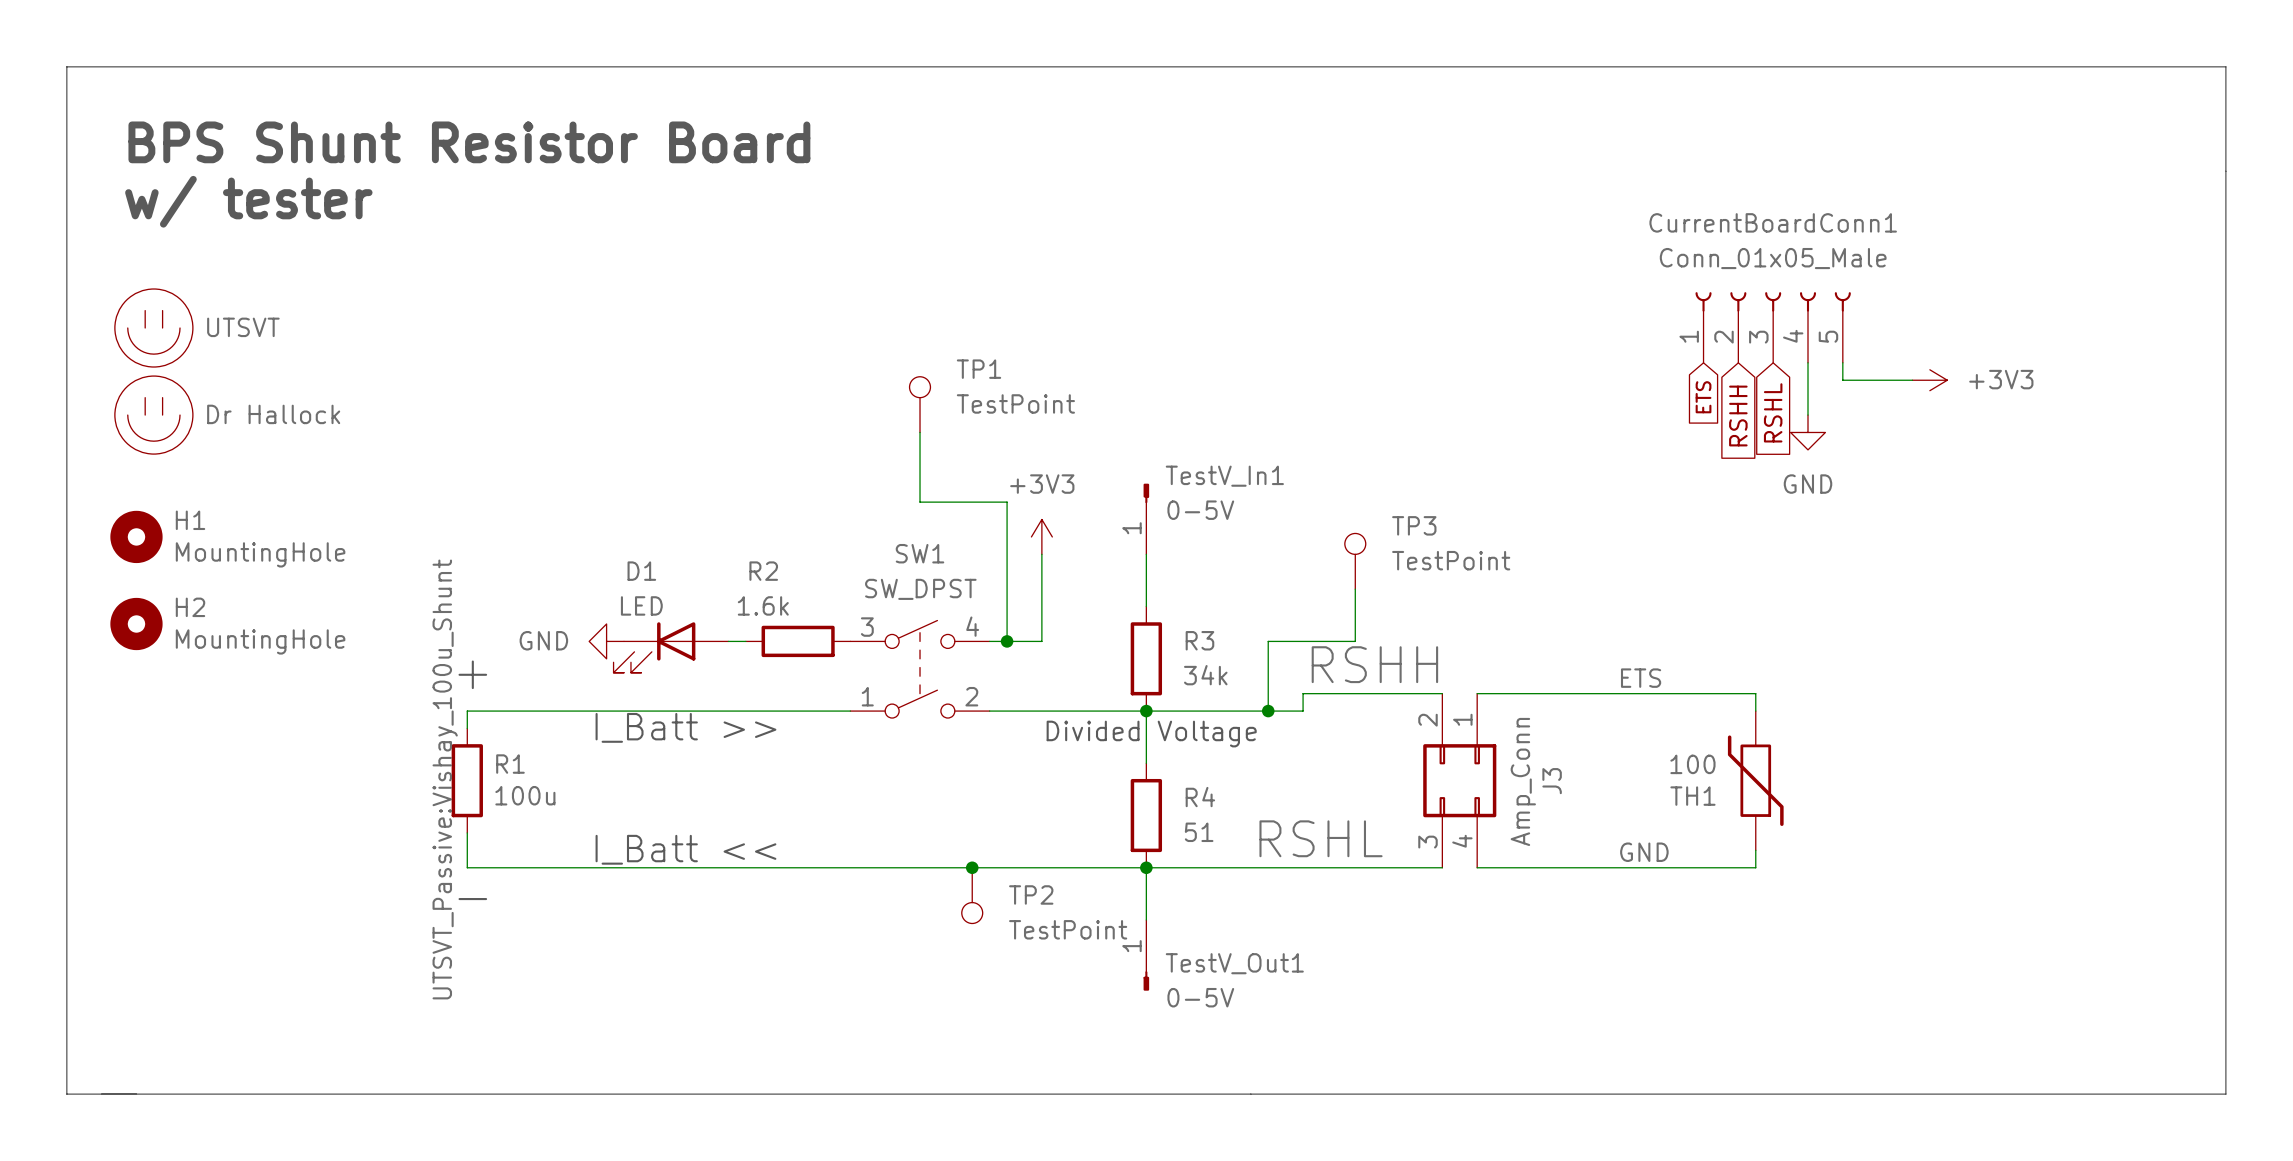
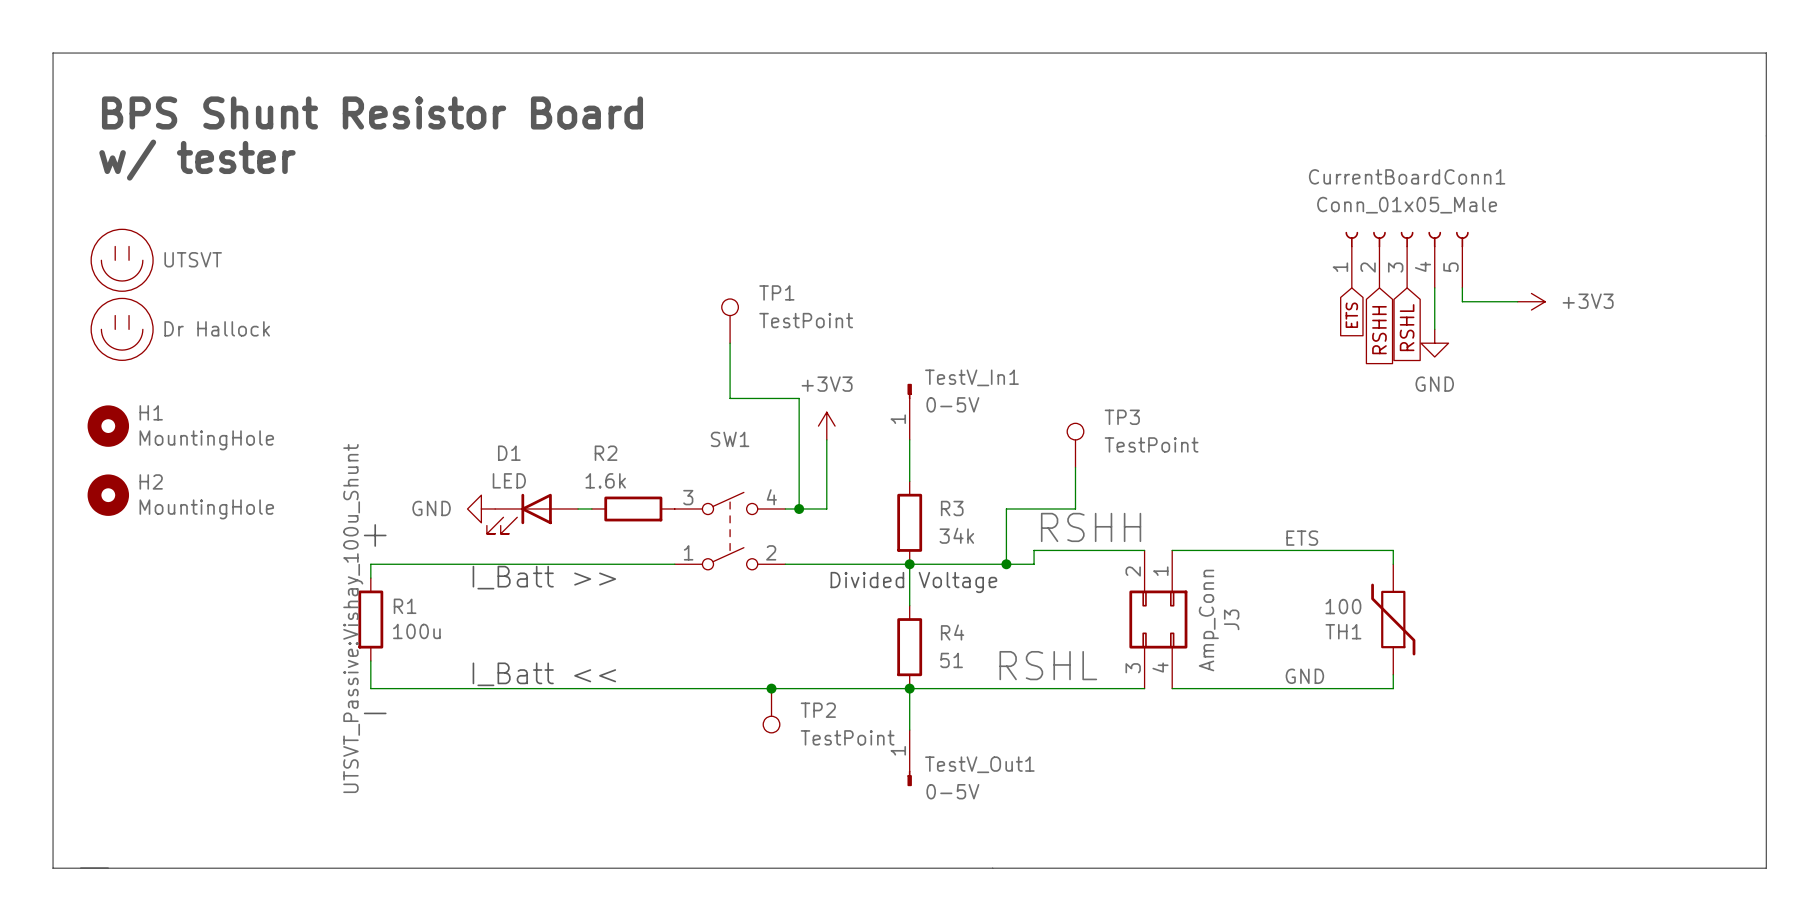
SW1 value: SW_DPST (920, 589) -> none

